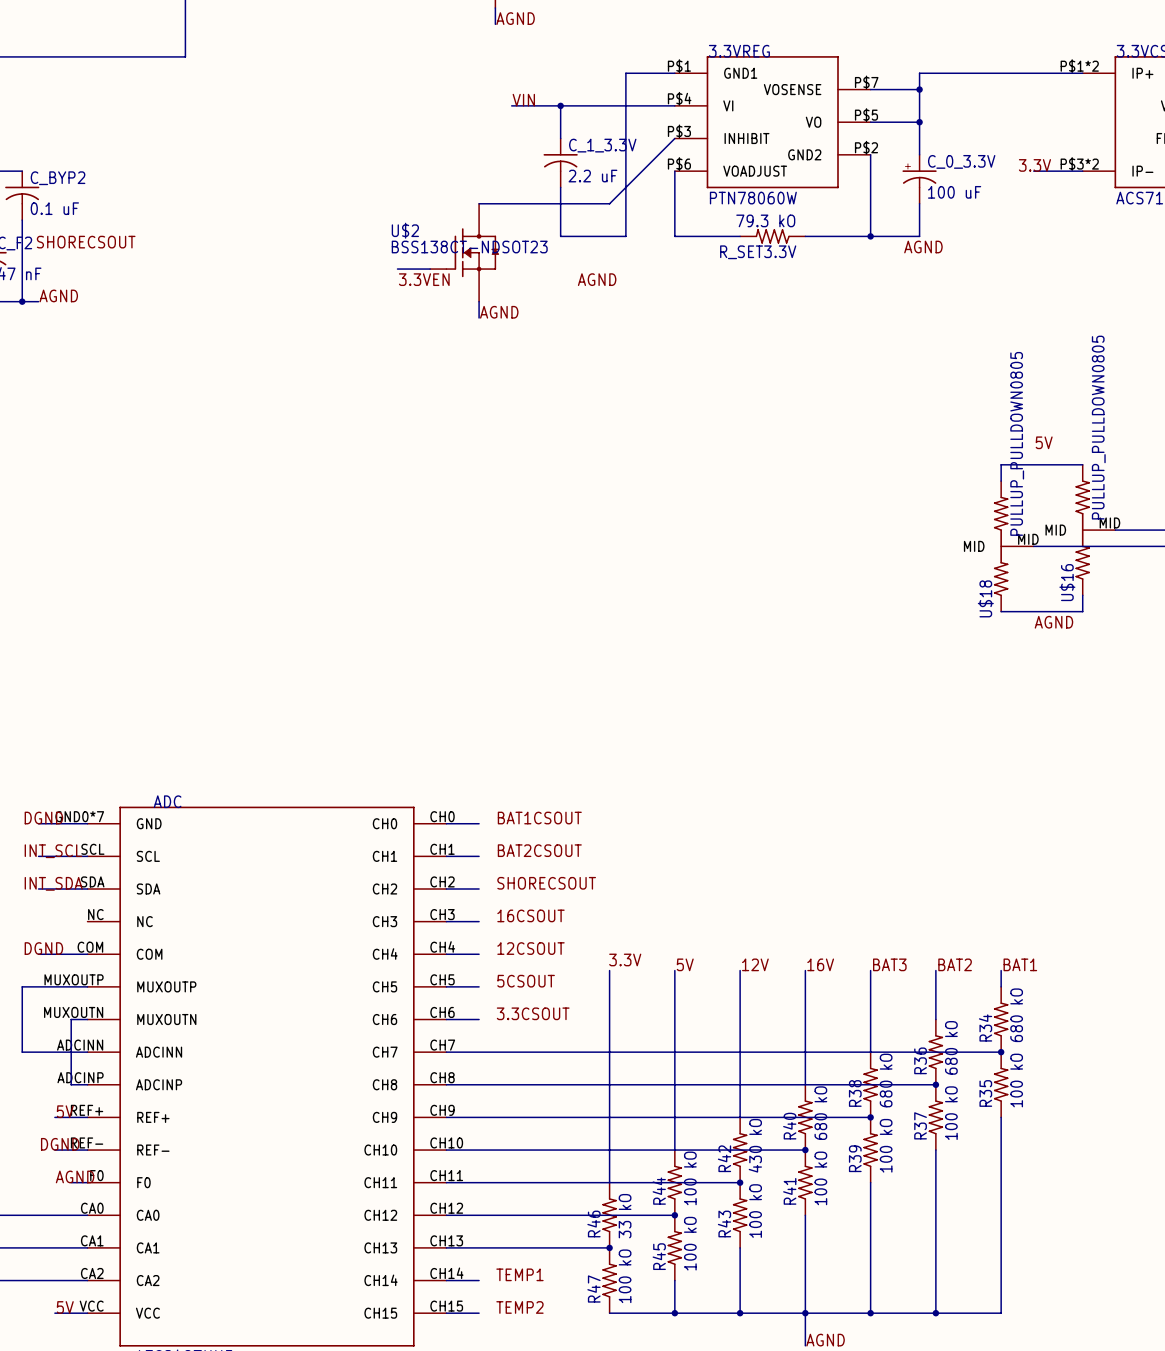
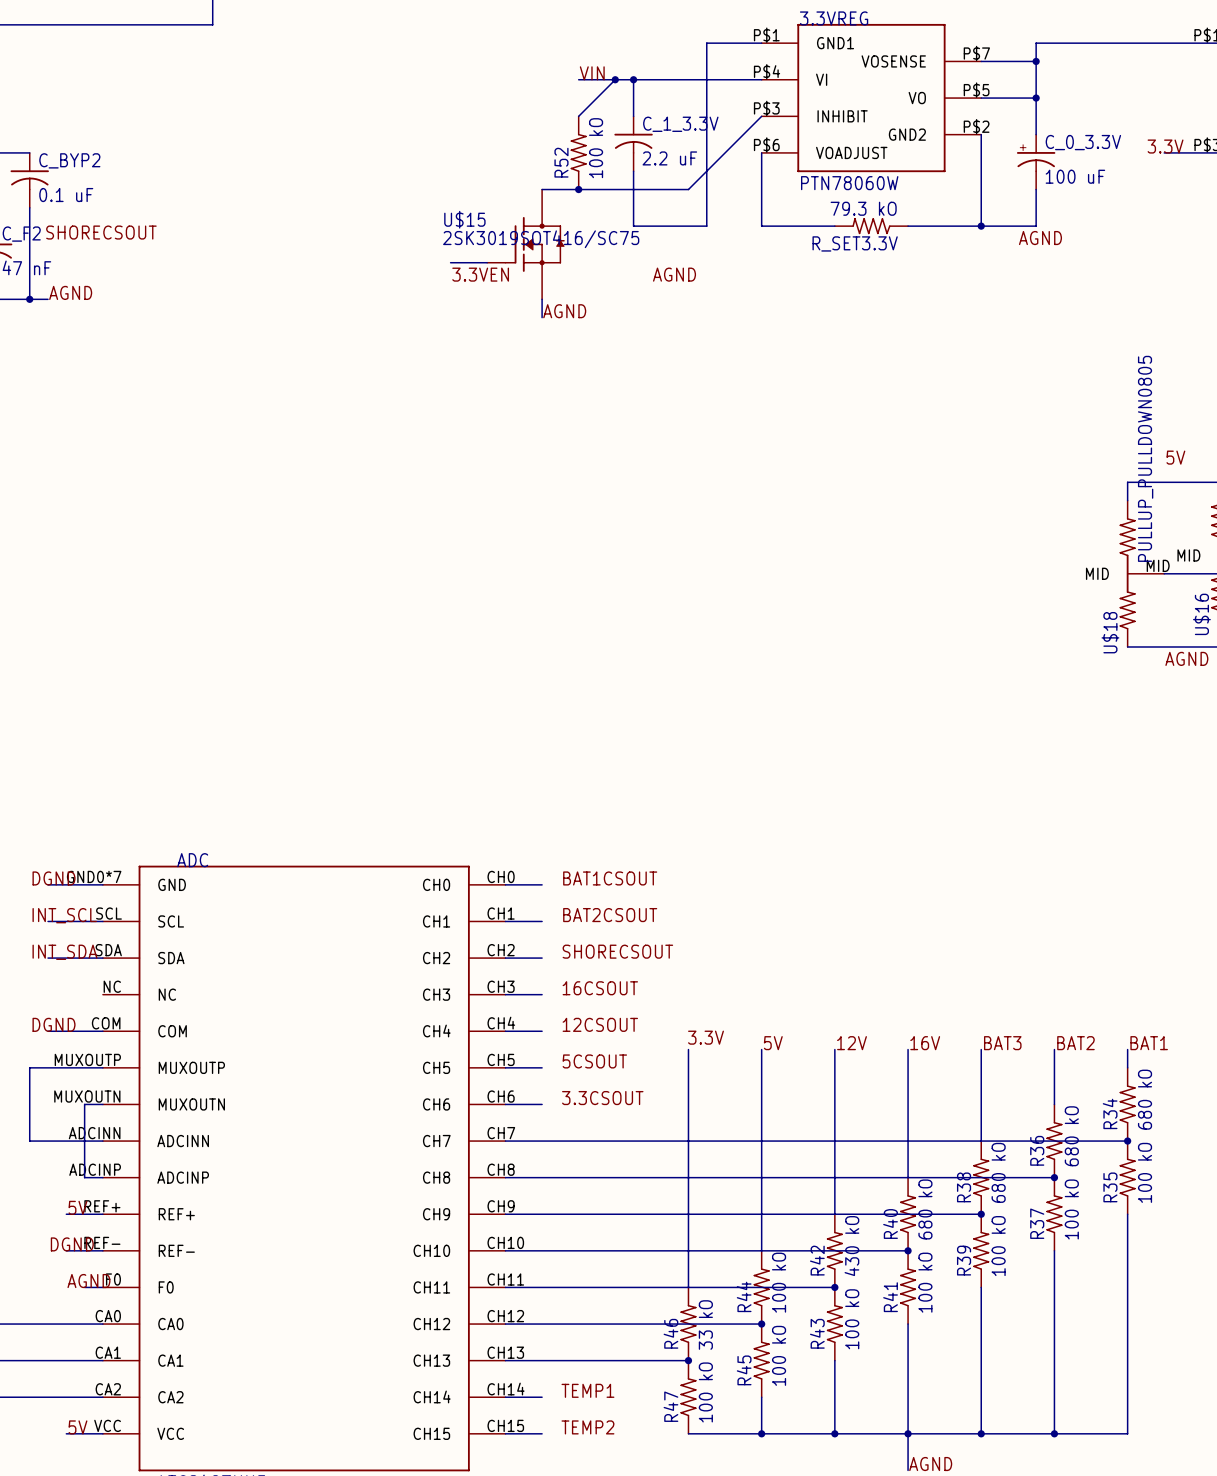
wire: none -> (615, 79) (578, 116)
junction: none -> (615, 79)
R52: none -> 100 kO (578, 152)
junction: none -> (578, 189)
U$2 name: U$2 (405, 230) -> U$15 (464, 219)
U$2 value: BSS138CT-NDSOT23 (469, 247) -> 2SK3019SOT416/SC75 (541, 239)

